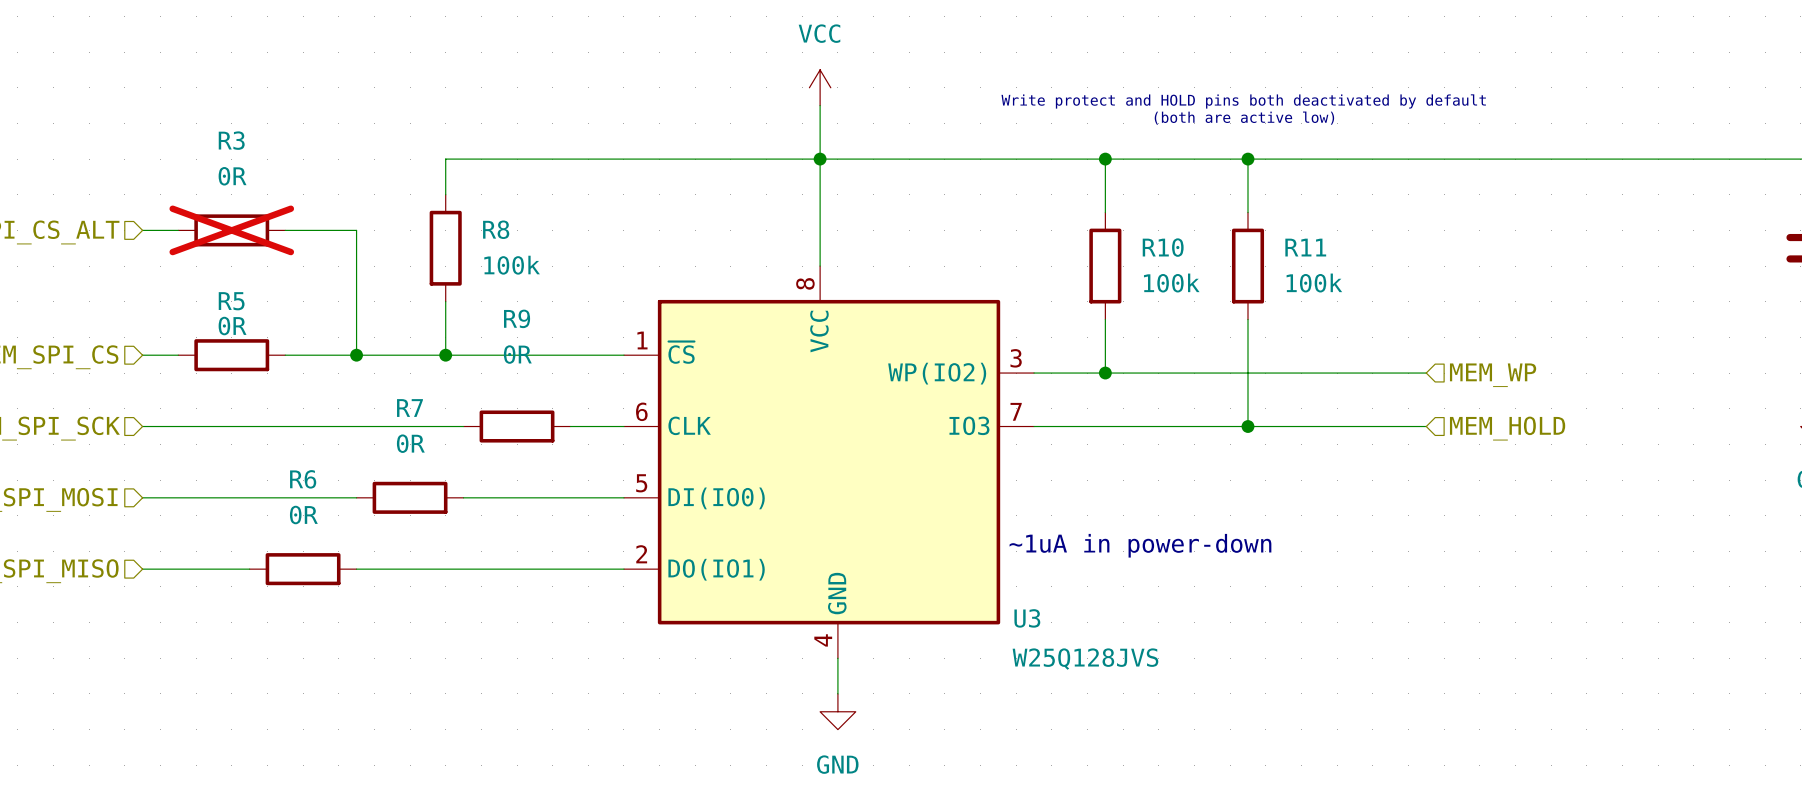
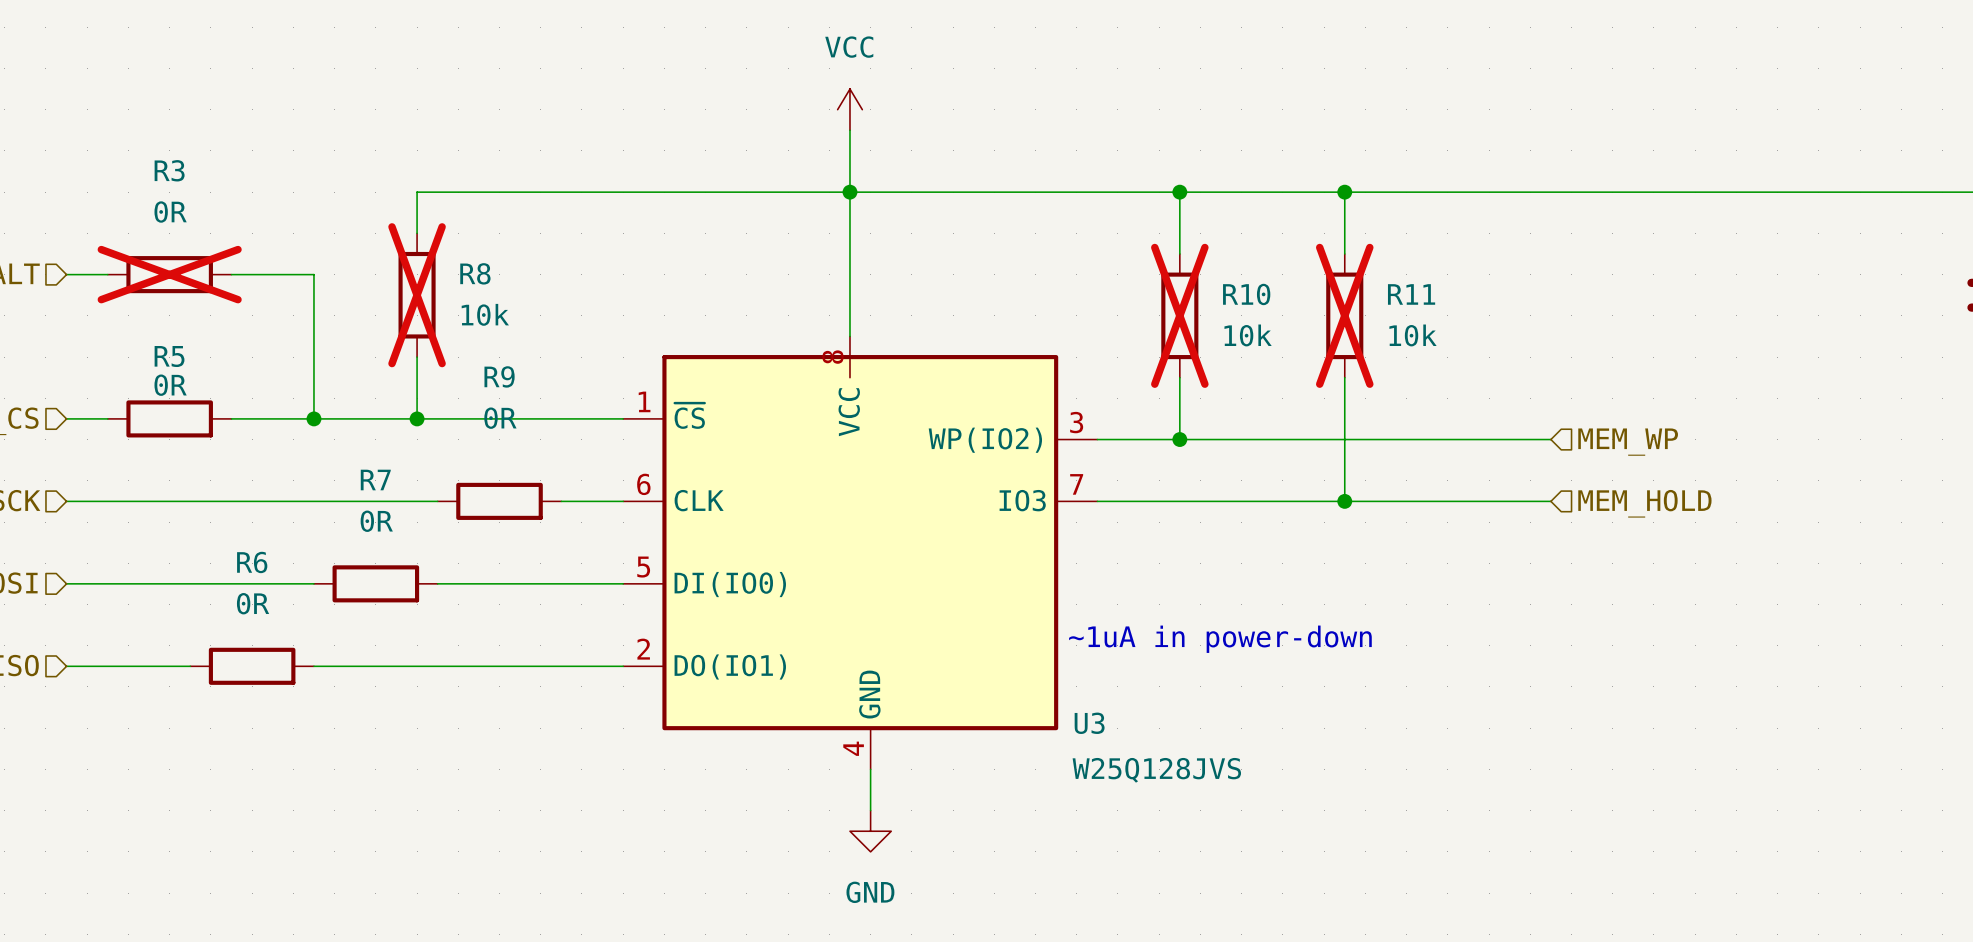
text: Write protect and HOLD pins both deactivated by default (1243, 101) -> none
text: (both are active low) (1244, 118) -> none
R8 do-not-place cross: none -> (417, 295)
R8 value: 100k (512, 265) -> 10k (485, 314)
U3 symbol: [623, 266, 1035, 659] -> [623, 336, 1098, 770]
R10 do-not-place cross: none -> (1179, 315)
R11 do-not-place cross: none -> (1344, 315)
R10 value: 100k (1171, 283) -> 10k (1248, 335)
R11 value: 100k (1314, 283) -> 10k (1413, 335)

